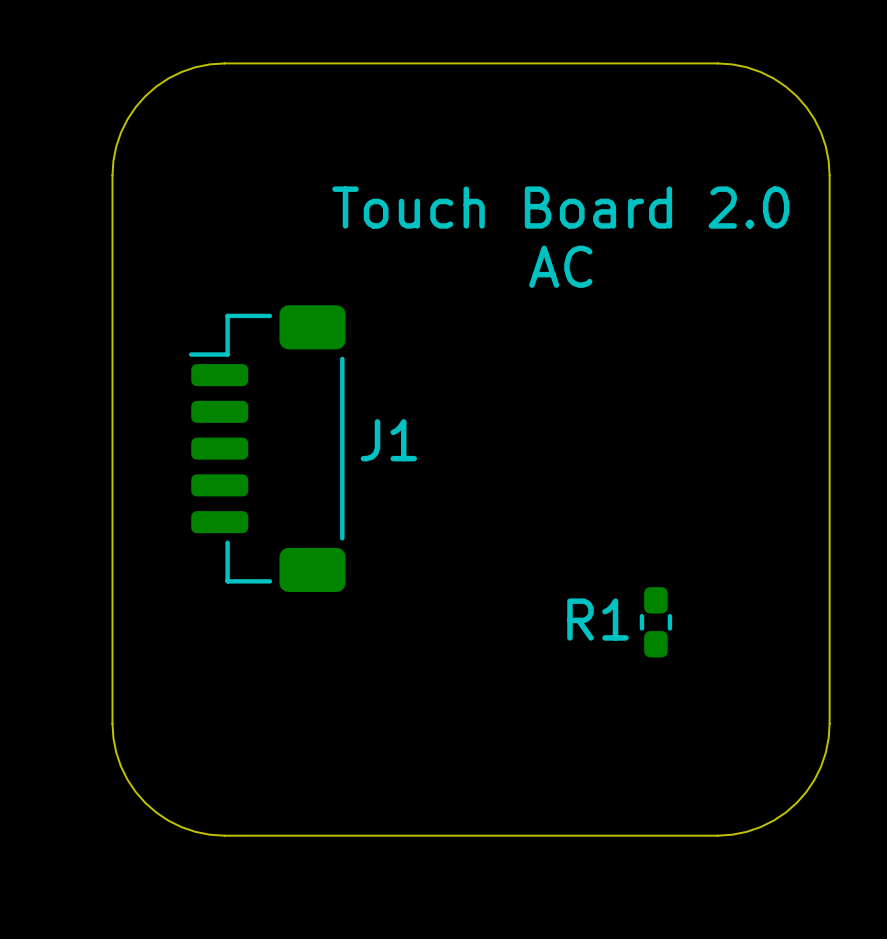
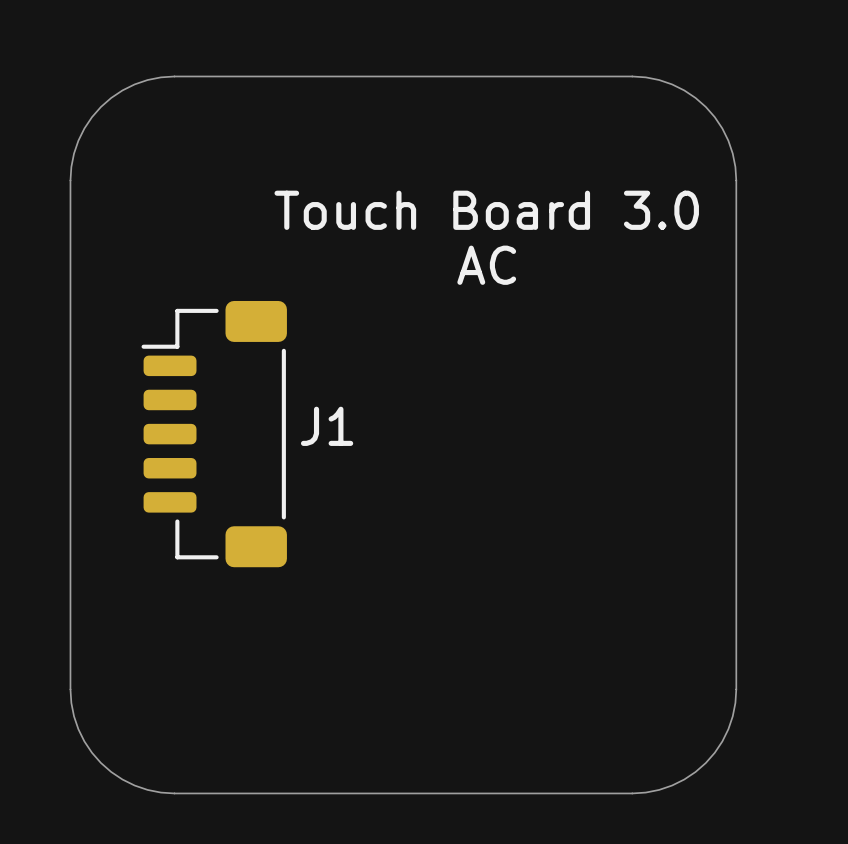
text: Touch Board 2.0 (560, 207) -> Touch Board 3.0 (486, 210)
R1: (655, 622) -> none

